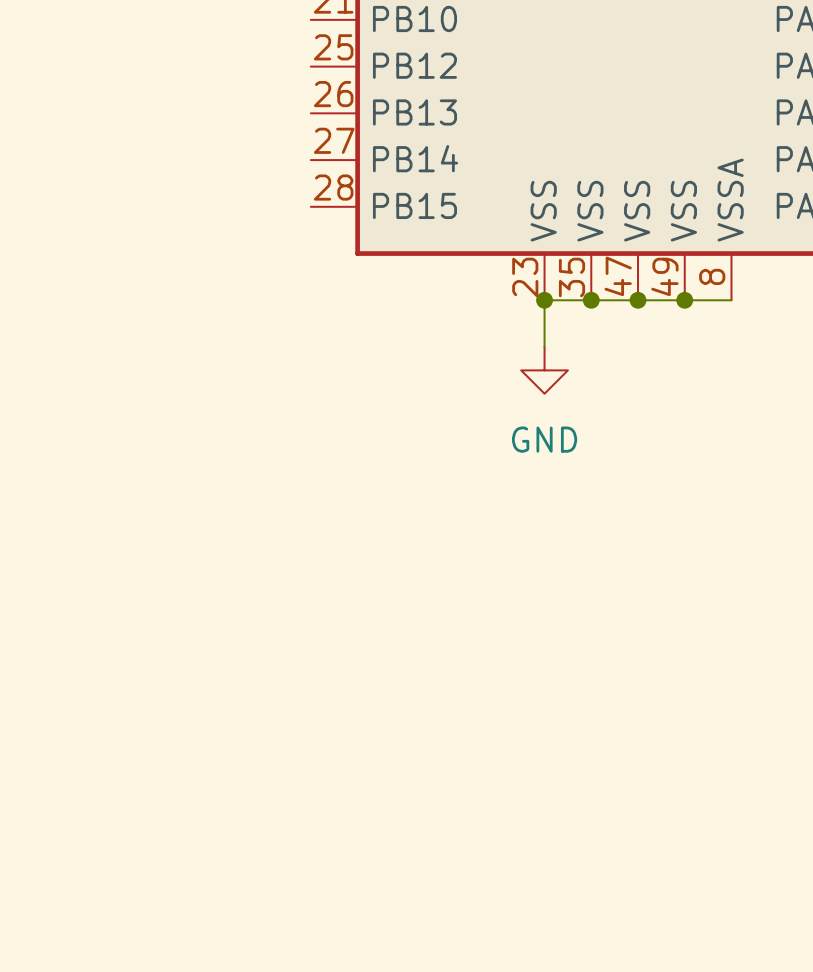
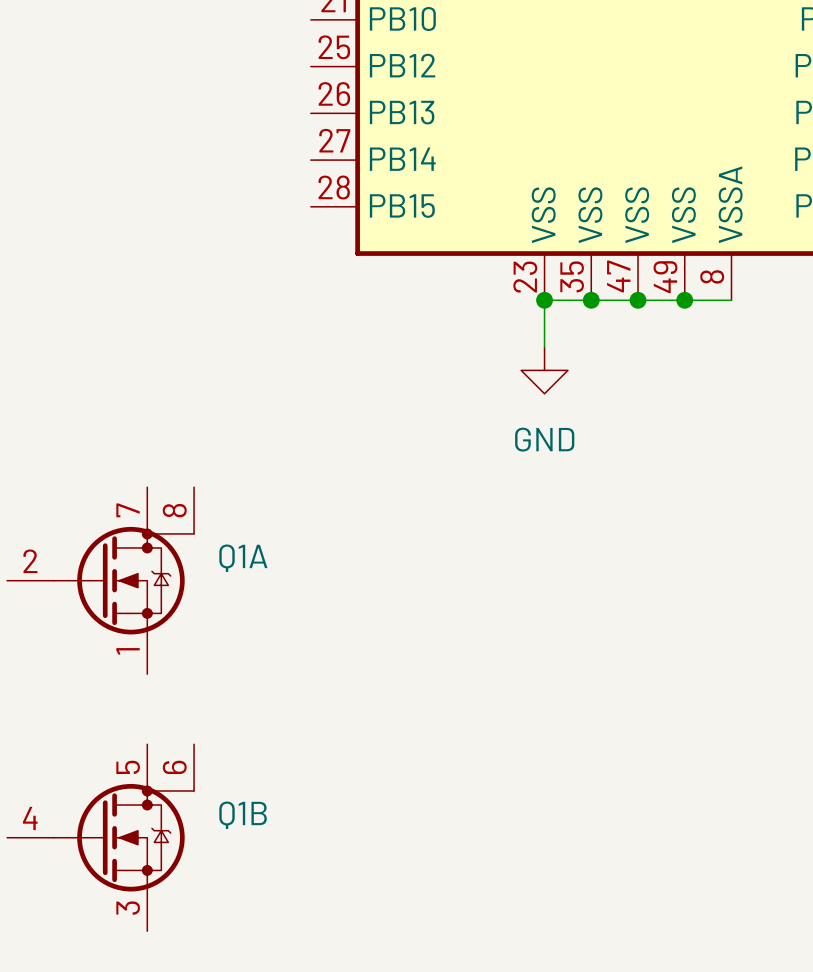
Q1A: none -> (100, 580)
Q1B: none -> (100, 837)

